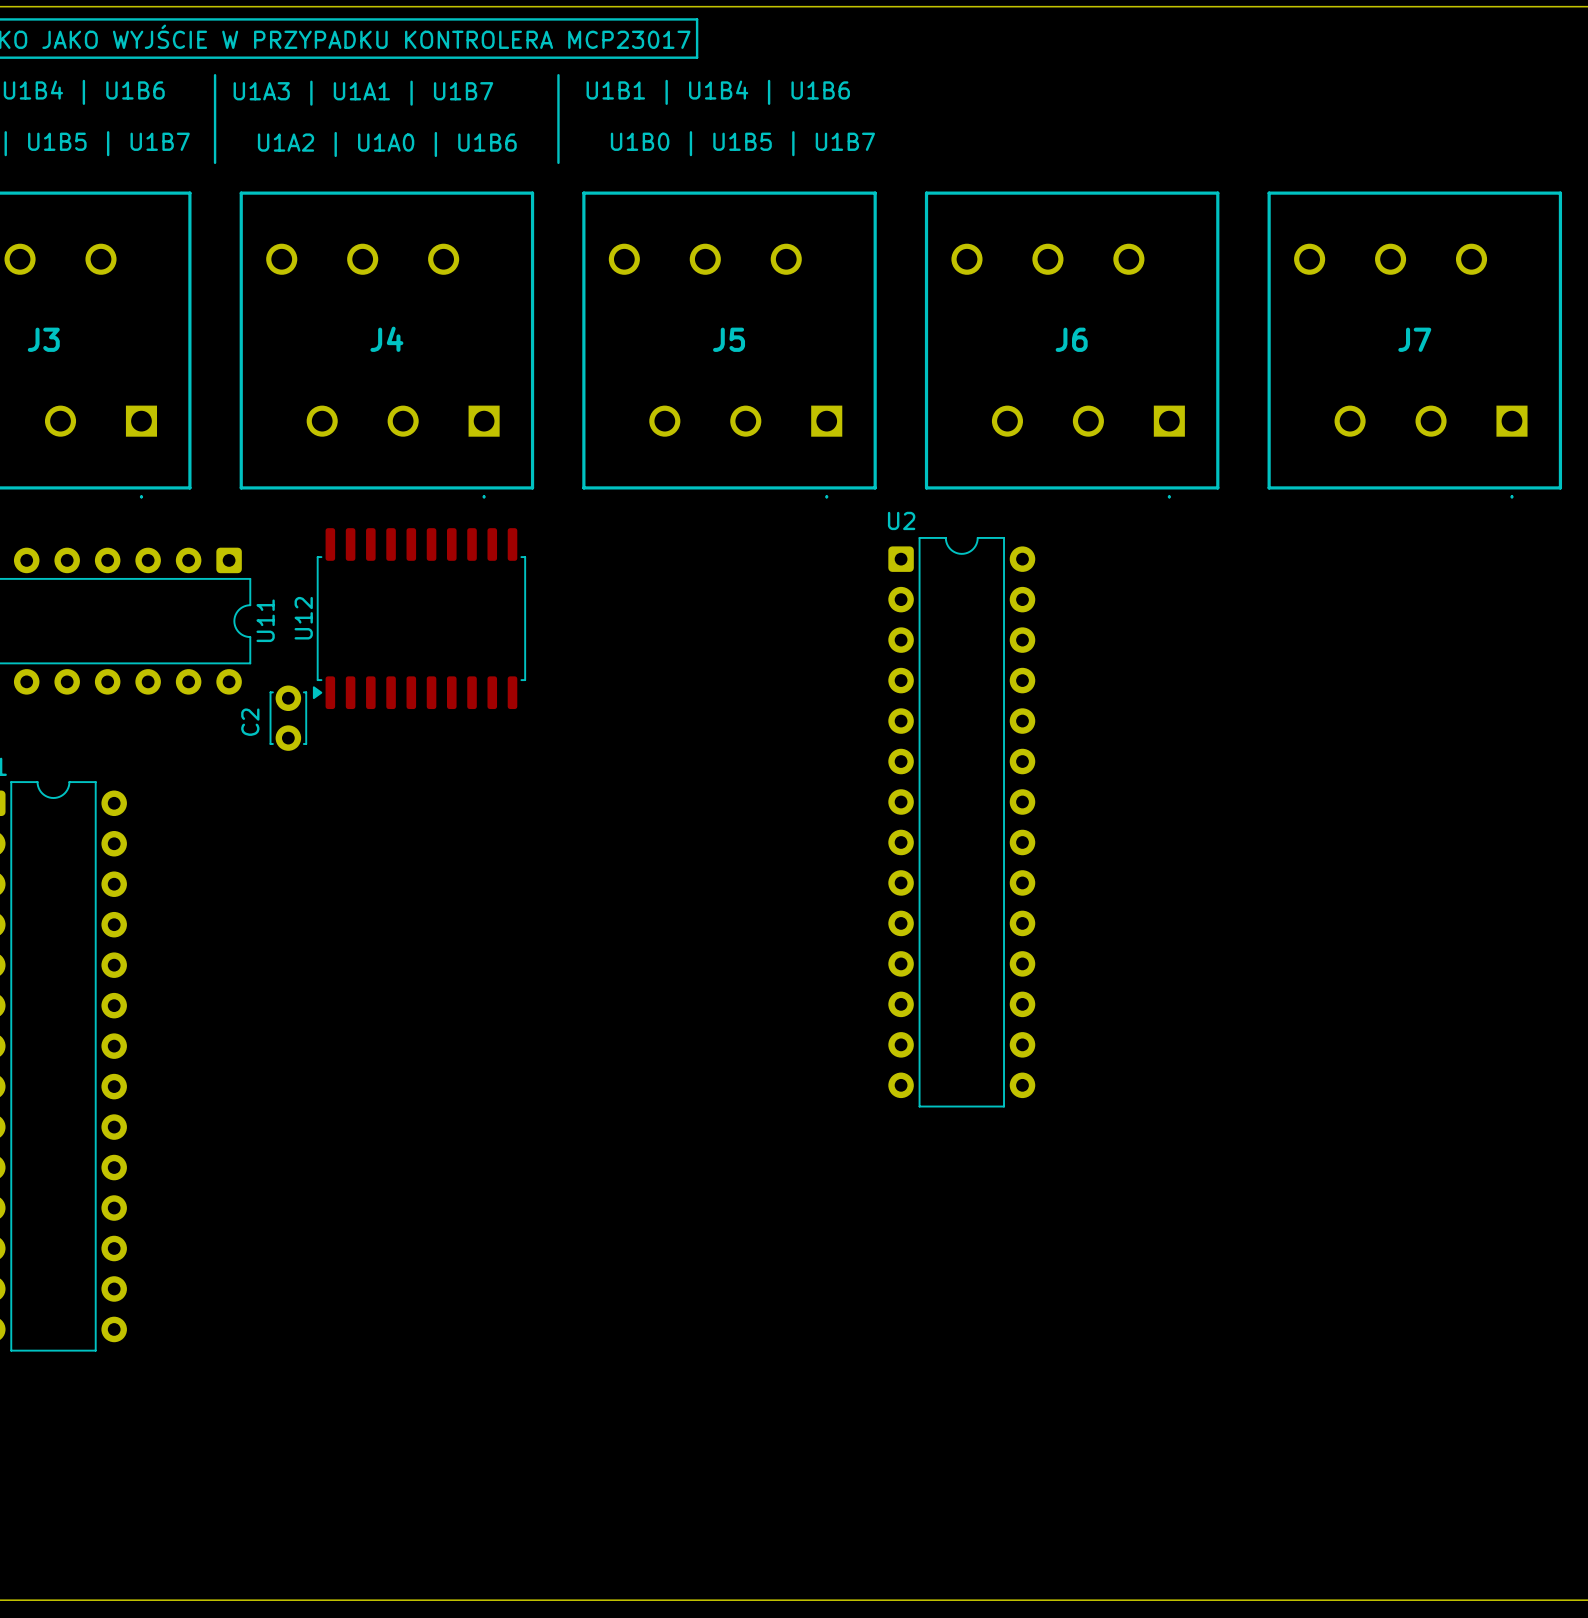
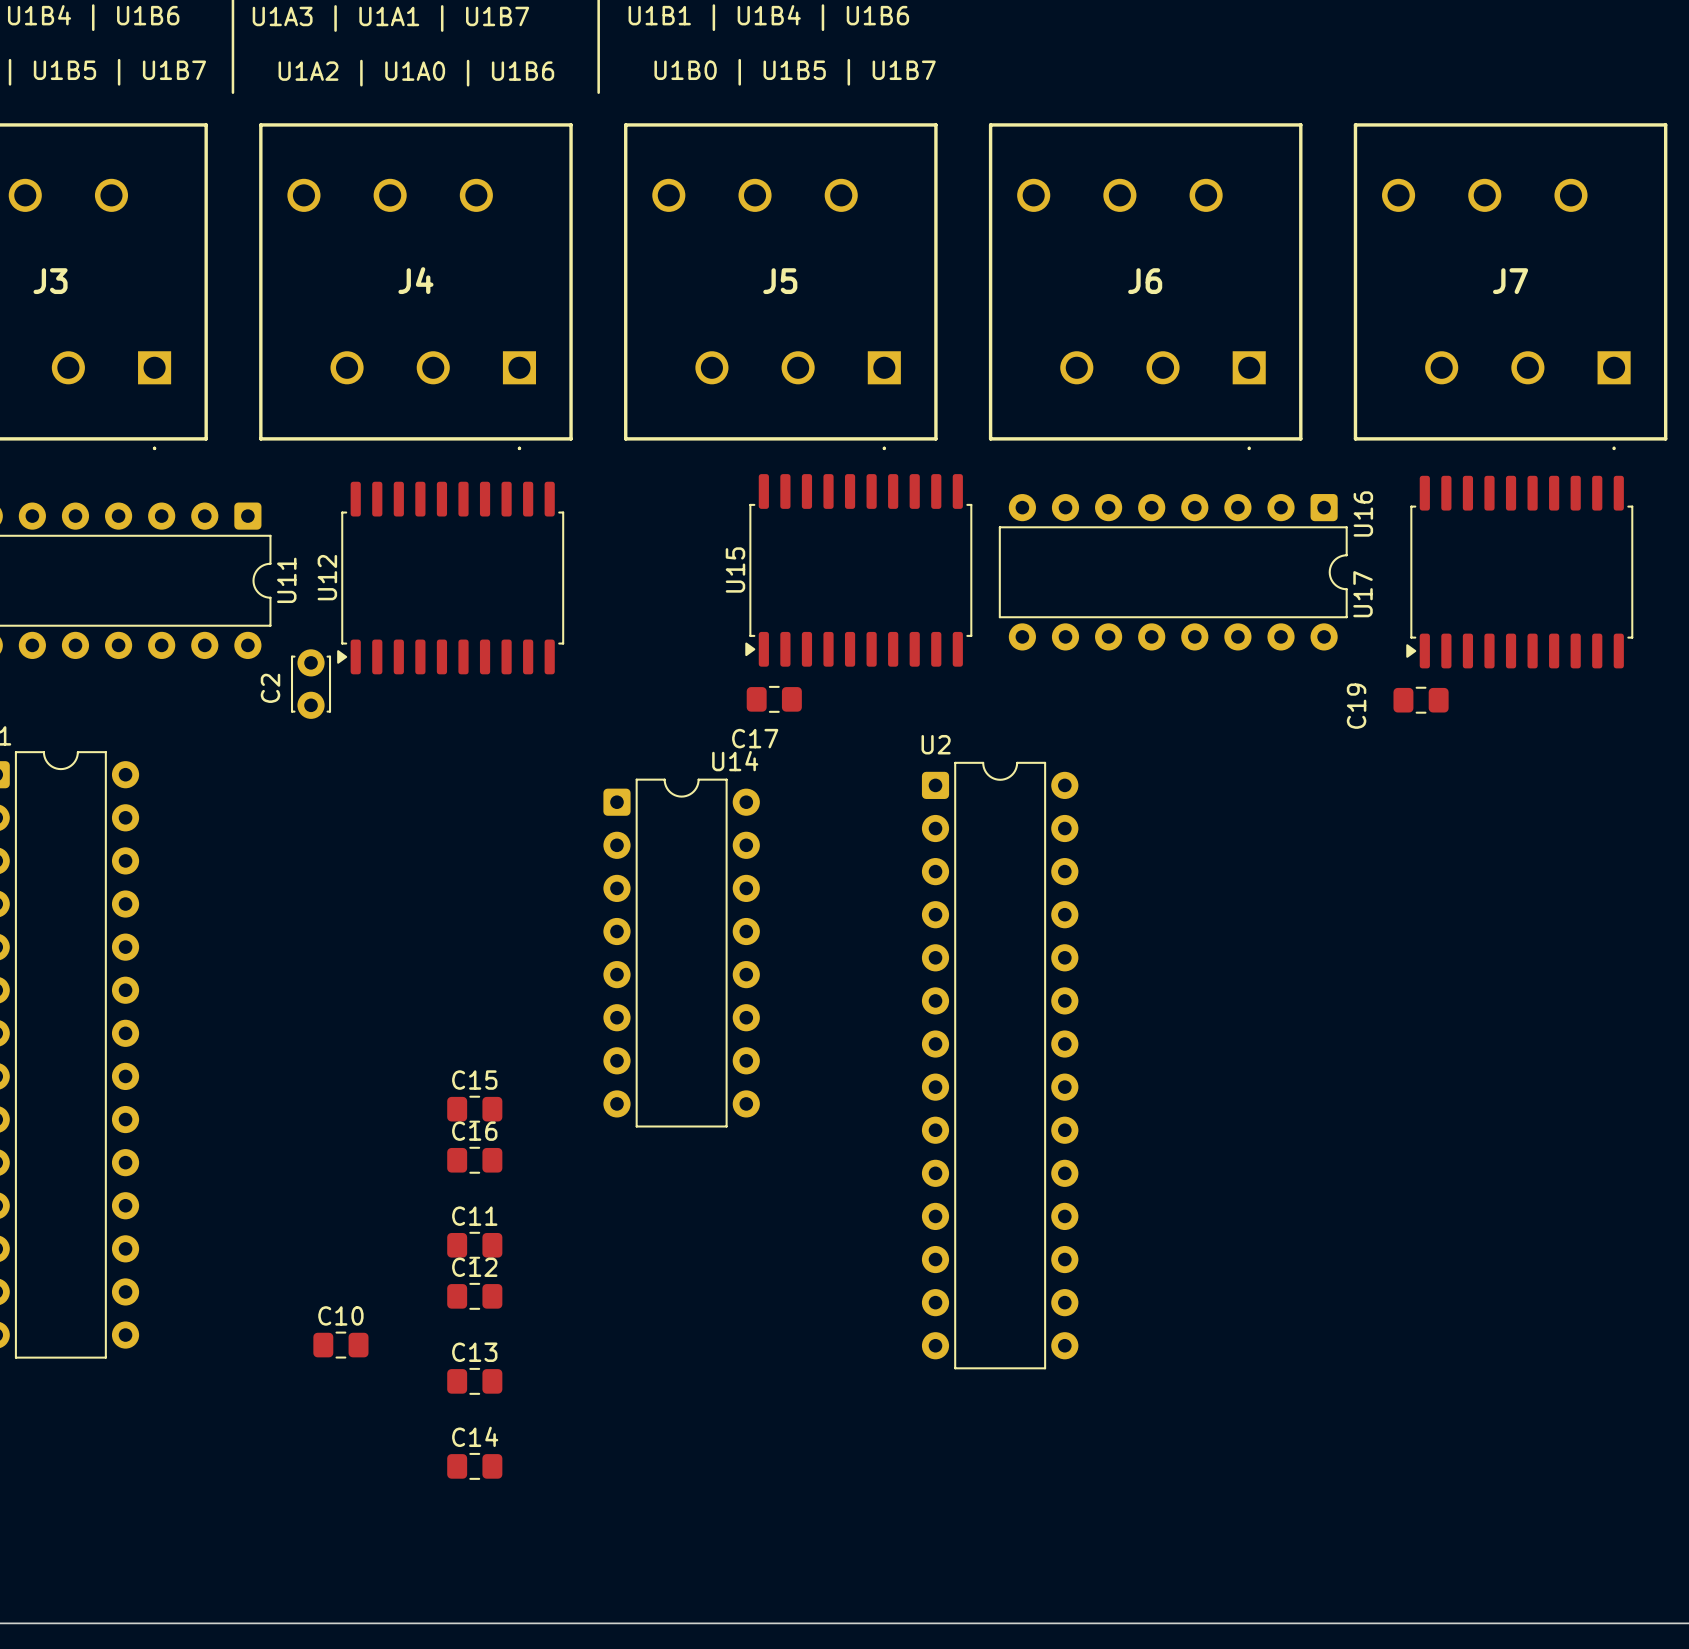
U15: none -> (858, 570)
U17: none -> (1173, 572)
U16: none -> (1519, 572)
C17: none -> (774, 699)
C19: none -> (1421, 700)
U2 position: (961, 822) -> (1000, 1065)
U14: none -> (681, 953)
C15: none -> (474, 1109)
C16: none -> (474, 1160)
C11: none -> (474, 1245)
C12: none -> (474, 1296)
C10: none -> (340, 1345)
C13: none -> (474, 1381)
C14: none -> (474, 1466)

